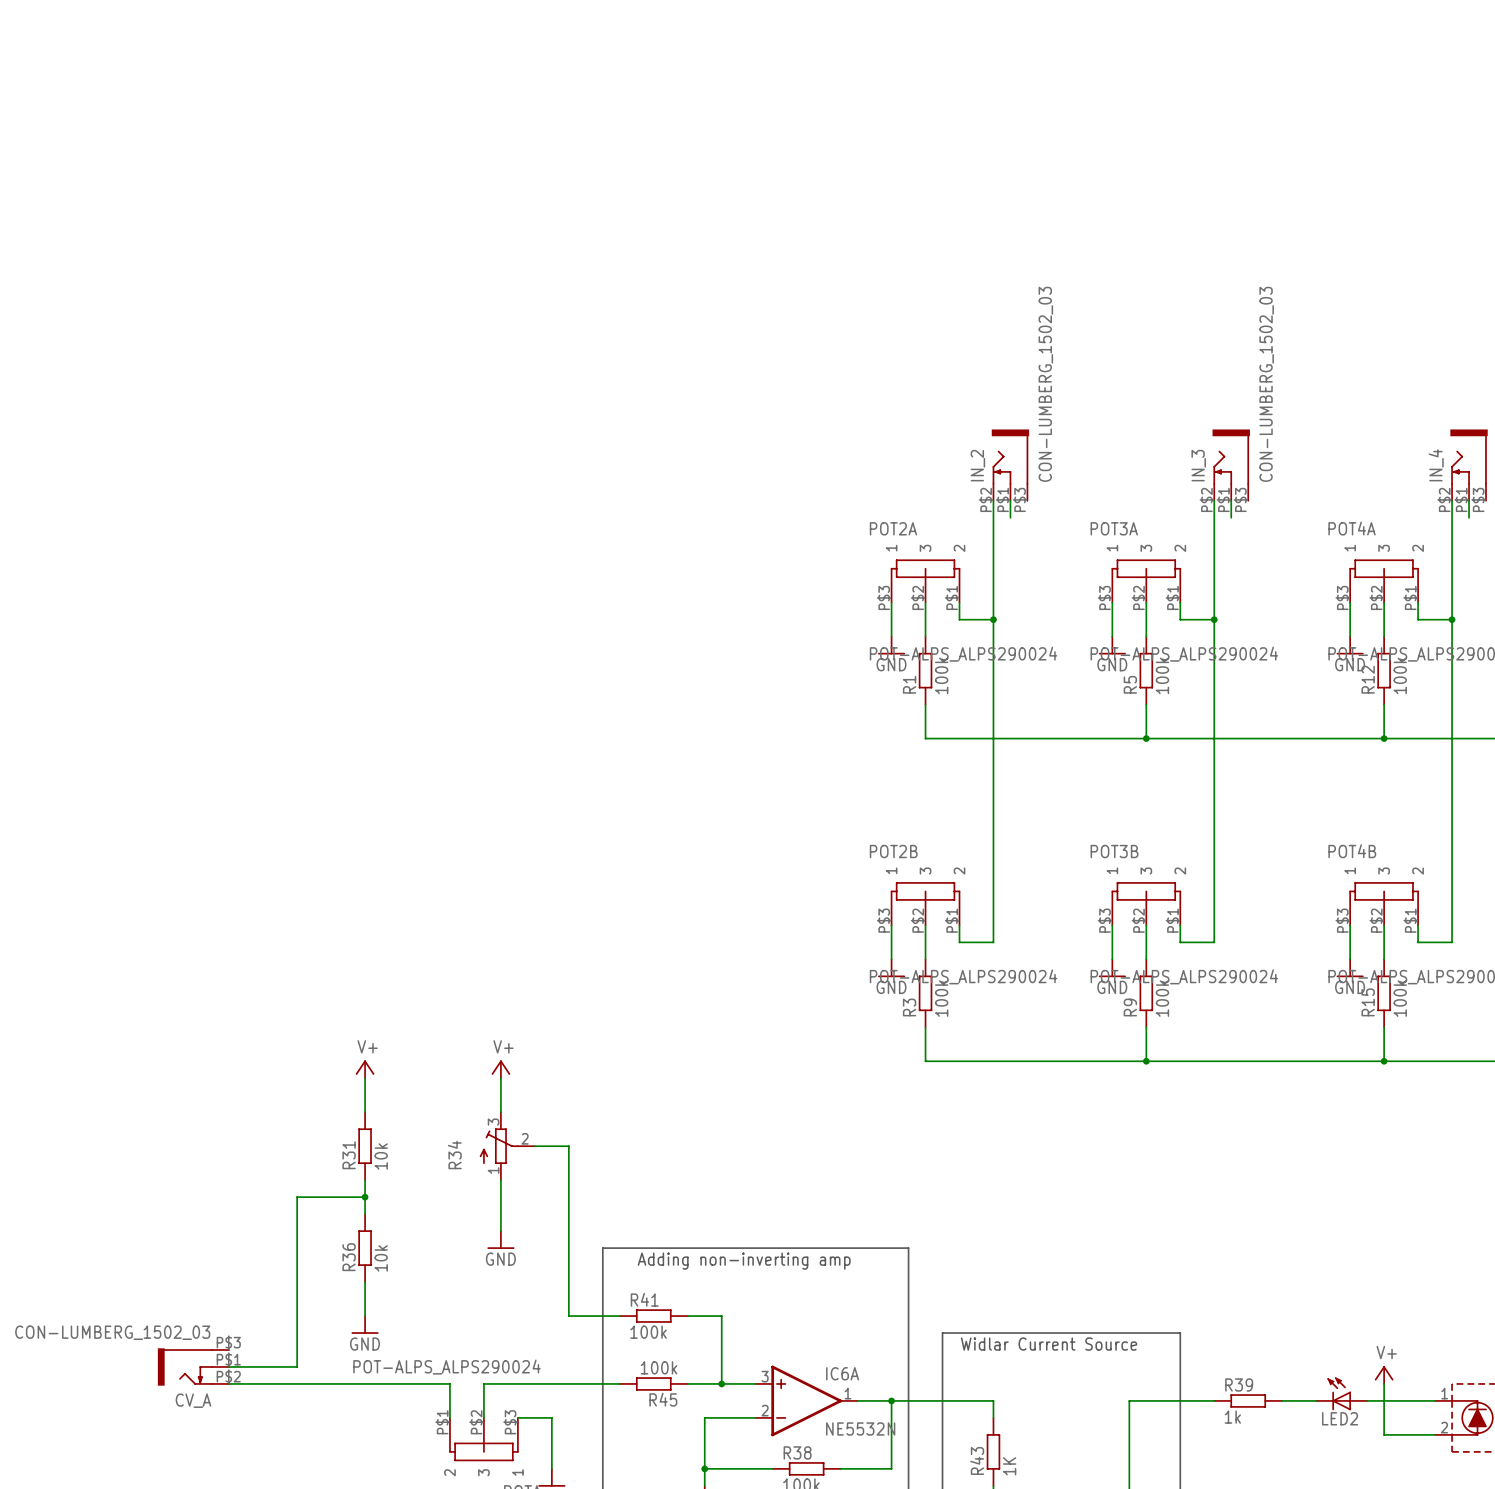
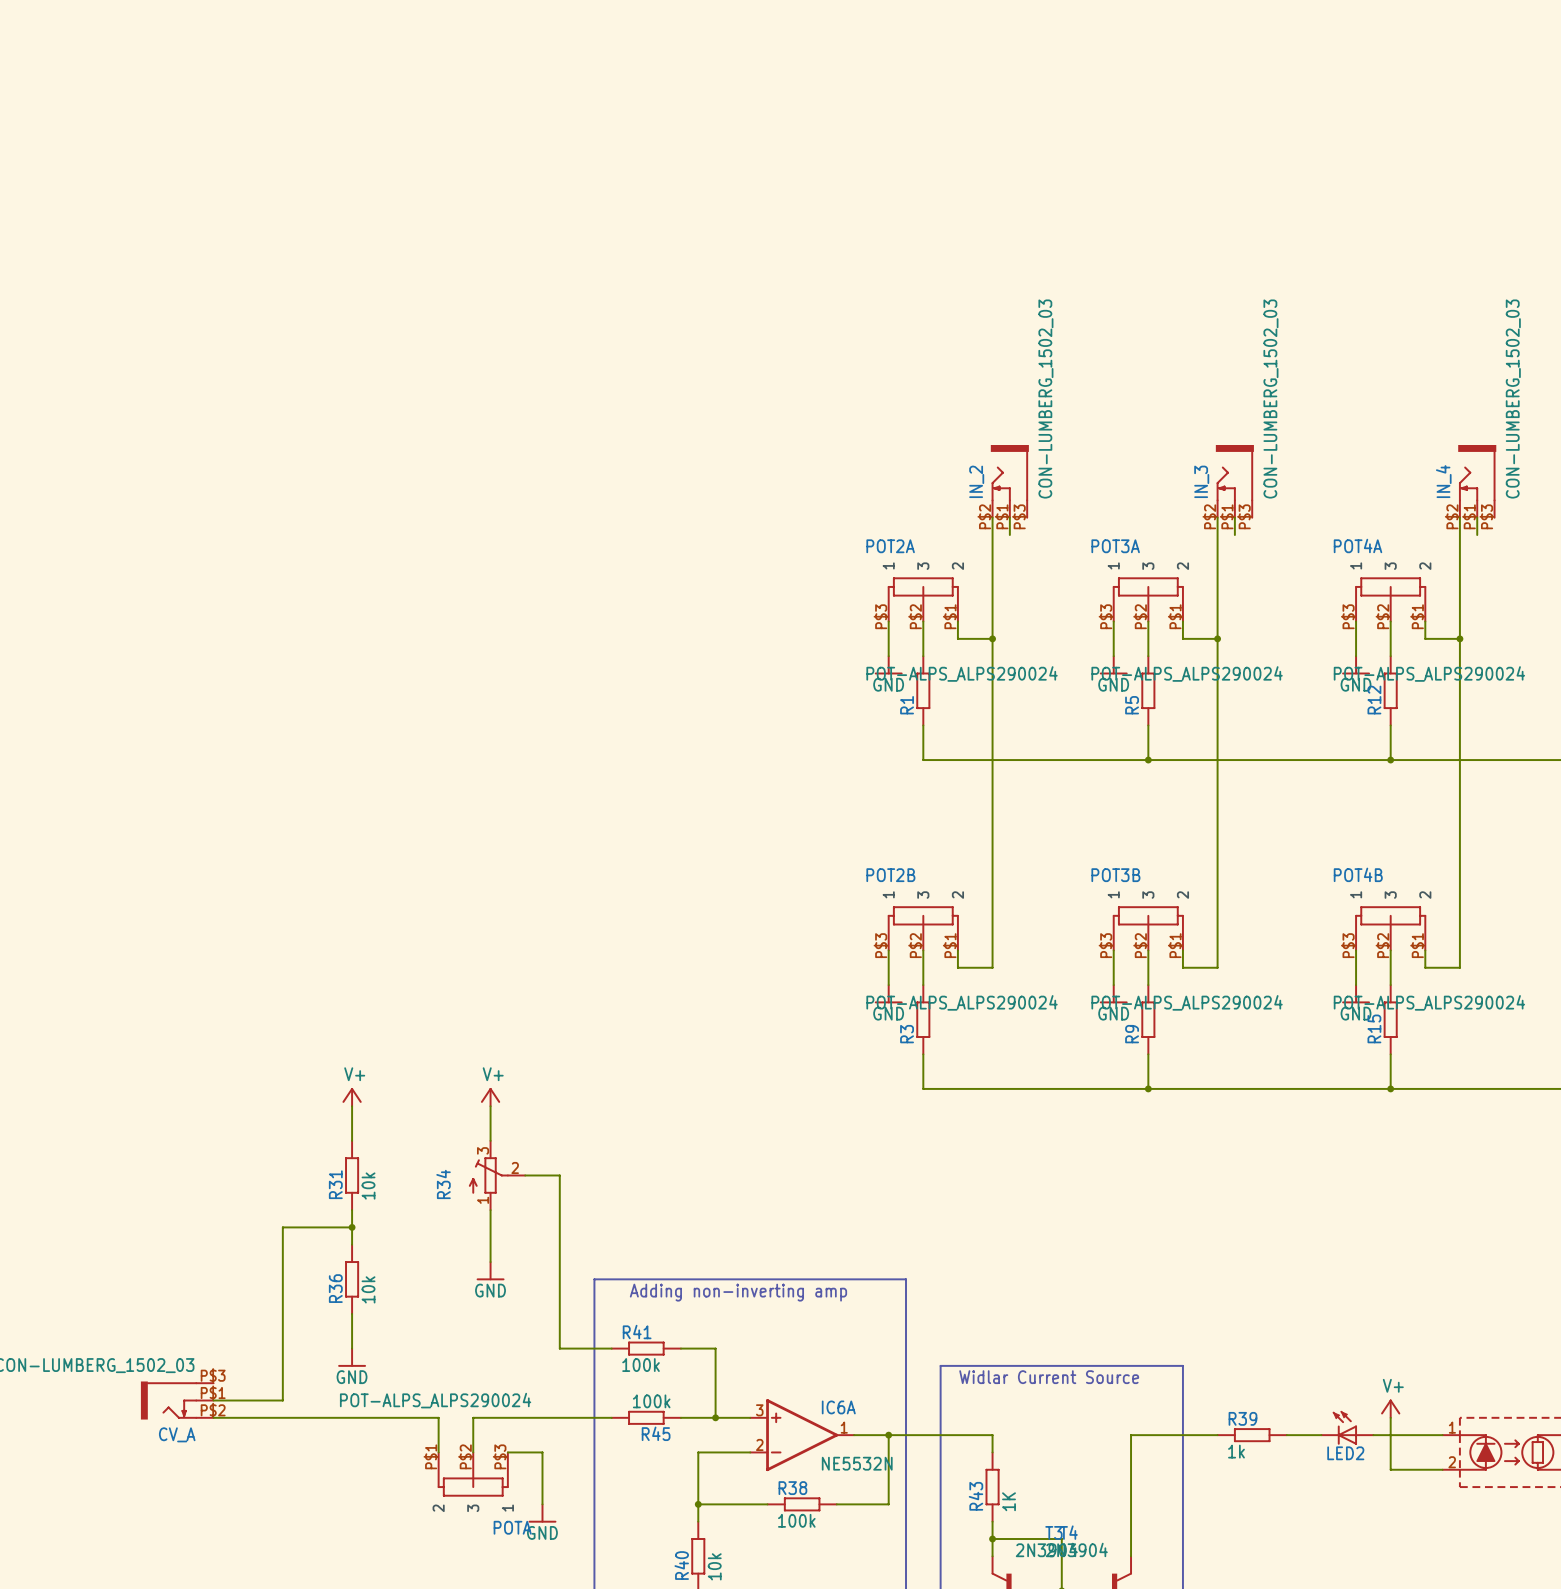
R1 value: 100k (941, 675) -> none
R5 value: 100k (1162, 675) -> none
R12 value: 100k (1400, 675) -> none
R3 value: 100k (941, 998) -> none
R9 value: 100k (1162, 998) -> none
R15 value: 100k (1400, 998) -> none

